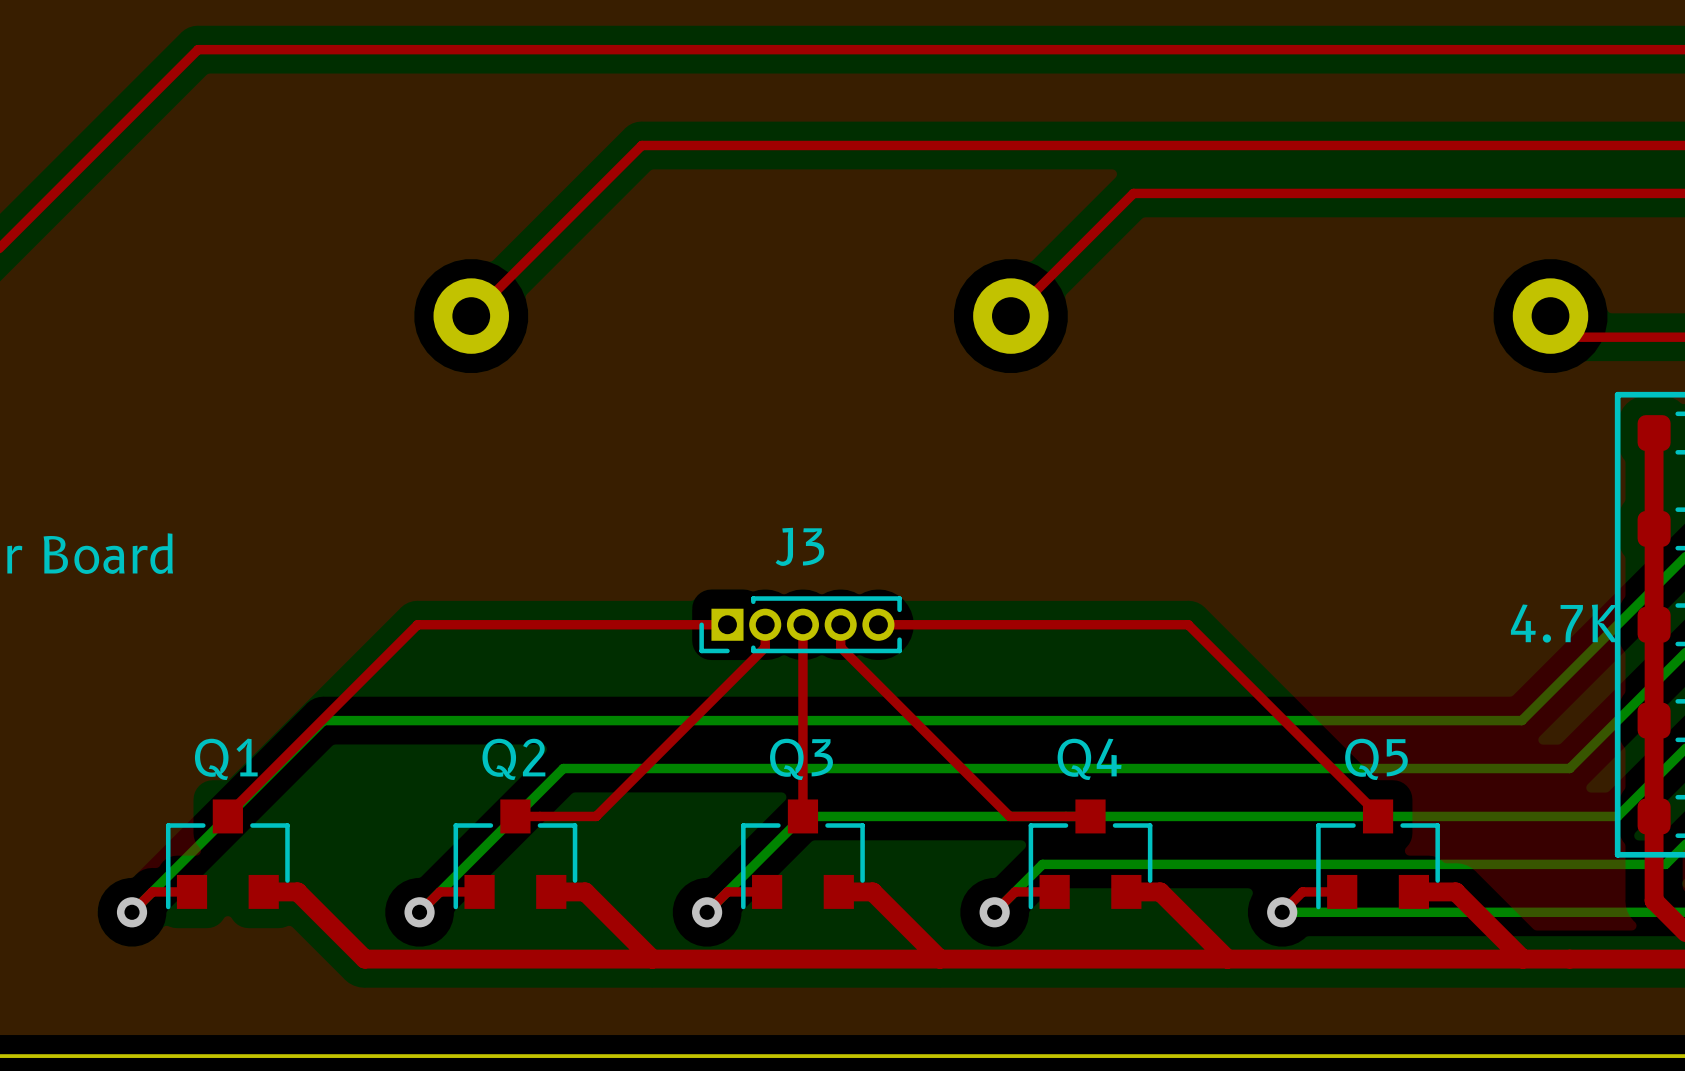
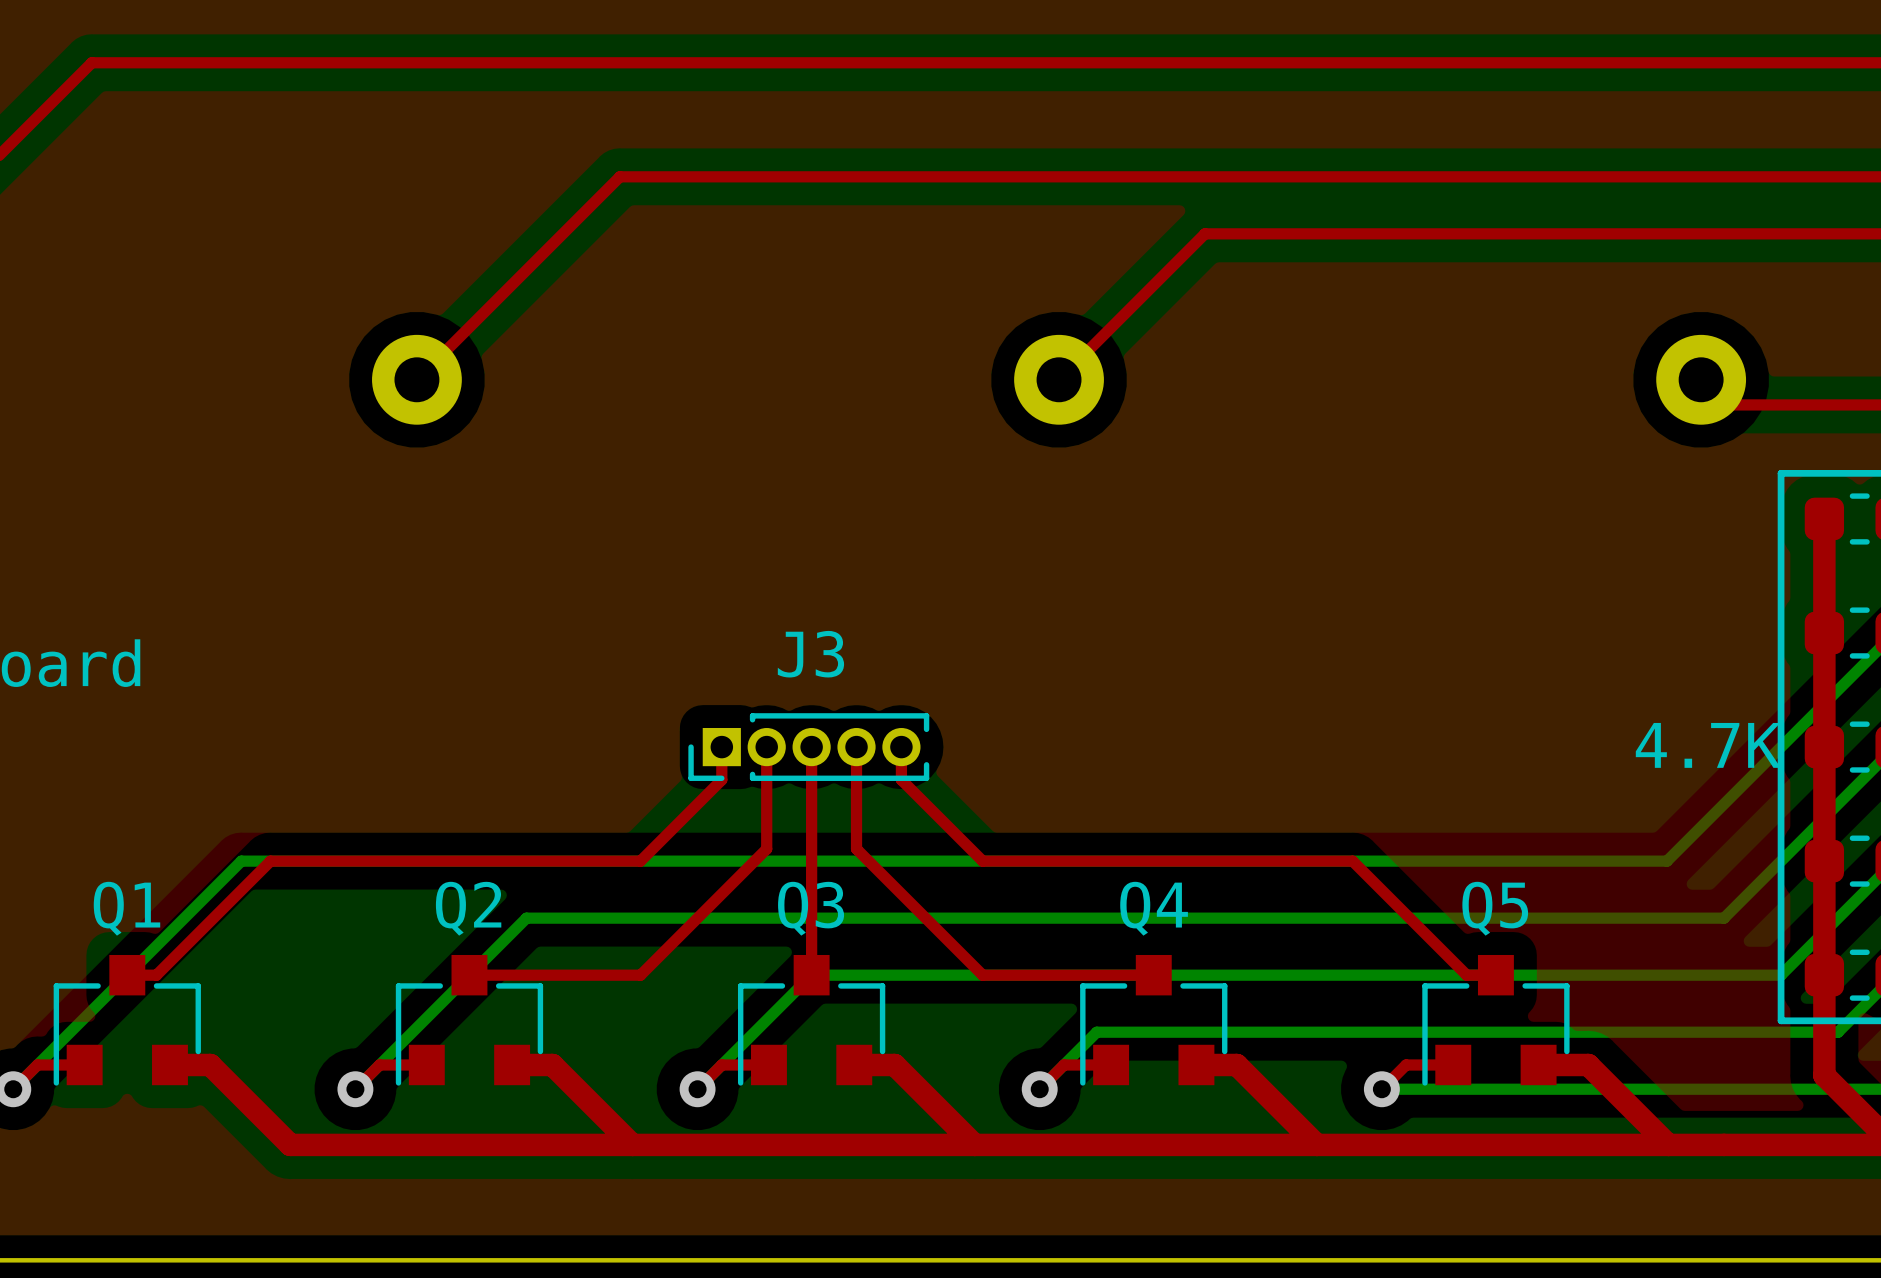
top track: (727, 624) (417, 624) (227, 816) -> (721, 747) (721, 779) (640, 861) (270, 861) (156, 975) (127, 975)
top track: (878, 624) (1188, 624) (1378, 816) -> (901, 747) (901, 779) (982, 861) (1352, 861) (1466, 975) (1495, 975)
top track: (765, 647) (596, 816) -> (766, 774) (766, 849) (640, 975) (565, 975)
top track: (840, 647) (1009, 816) -> (856, 774) (856, 849) (982, 975) (1057, 975)

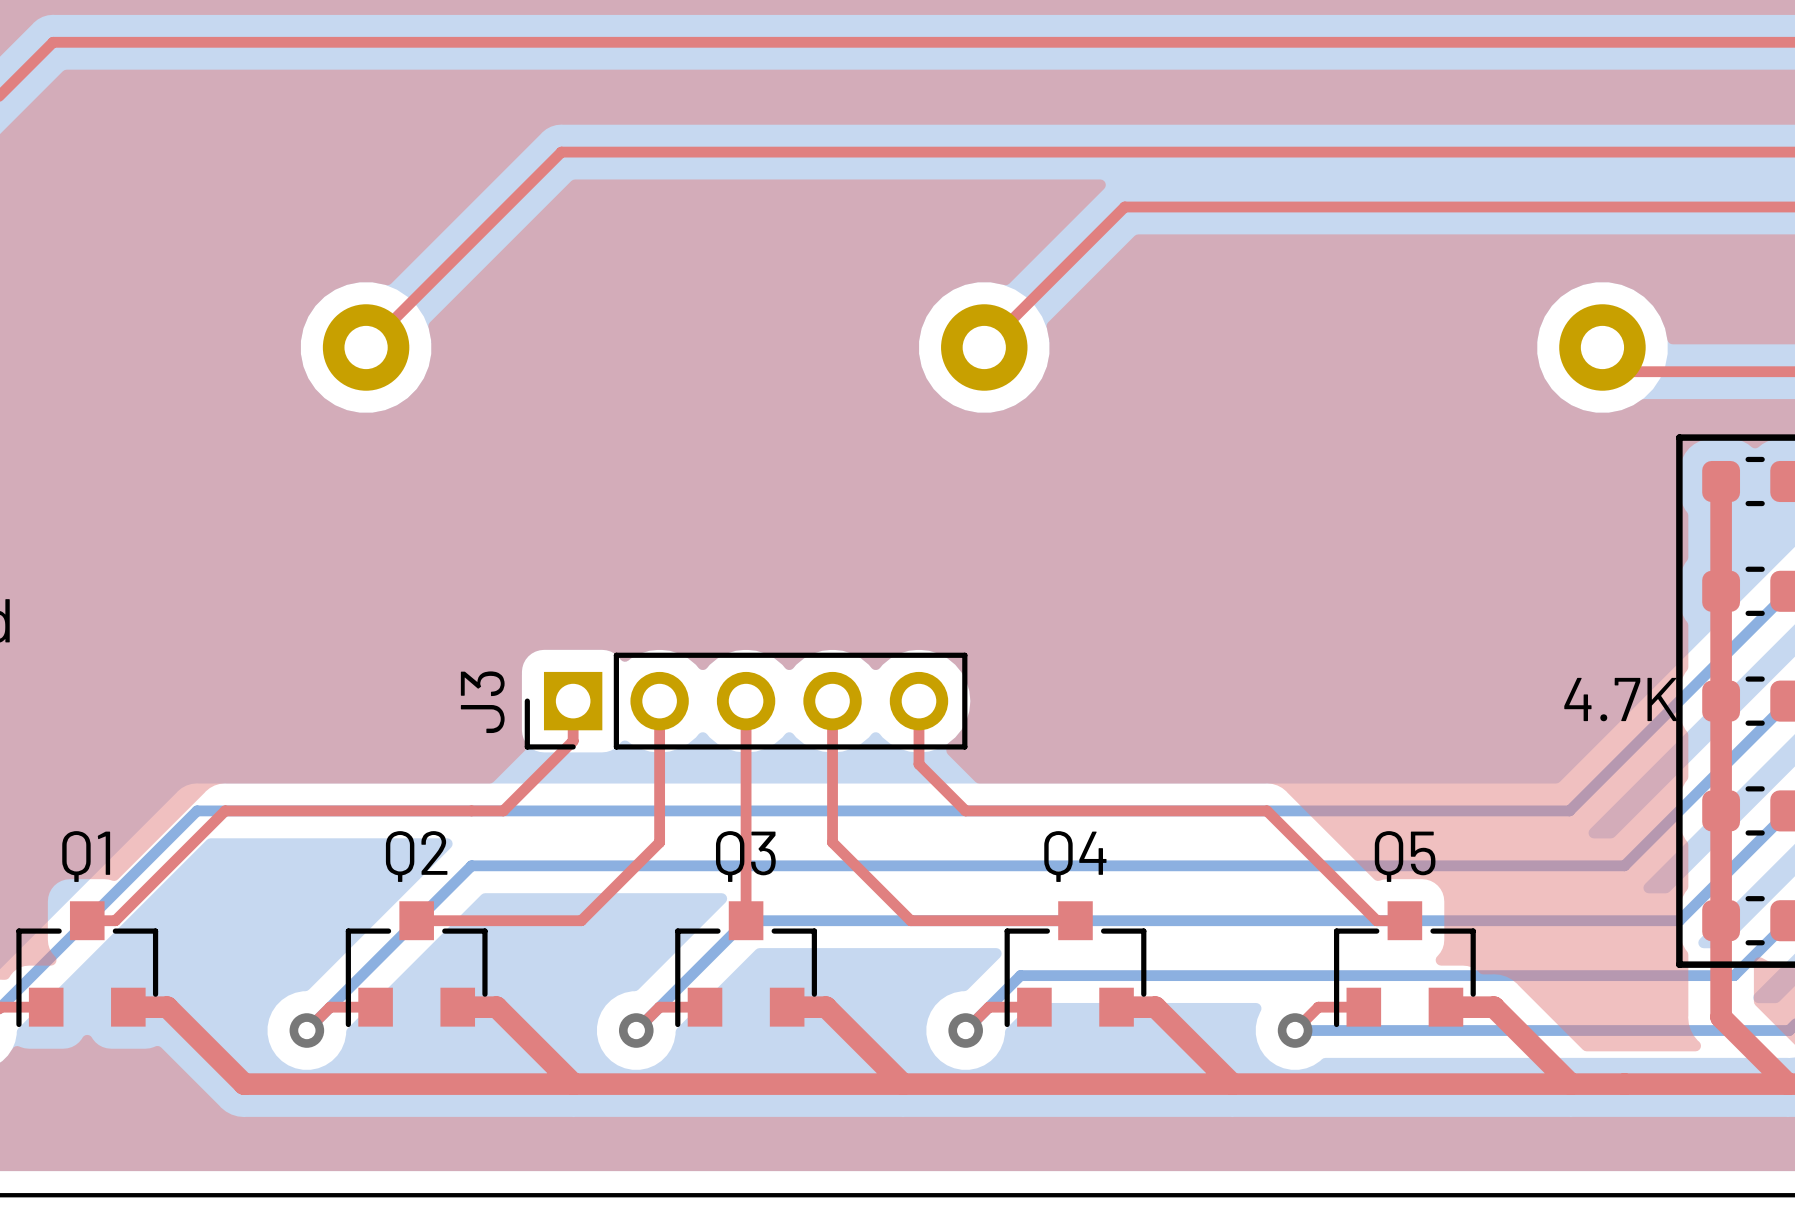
J3 name position: J3 (810, 654) -> J3 (482, 702)
J3 footprint: [688, 713, 930, 781] -> [524, 652, 968, 750]
top track: (766, 747) (766, 849) (721, 893) -> (659, 732) (659, 842)
top track: (856, 747) (856, 849) (901, 893) -> (832, 732) (832, 842)
top track: (721, 779) (640, 861) (559, 861) -> (573, 701) (573, 741) (503, 810)
top track: (901, 779) (982, 861) (1039, 861) -> (918, 701) (918, 764) (965, 810)

